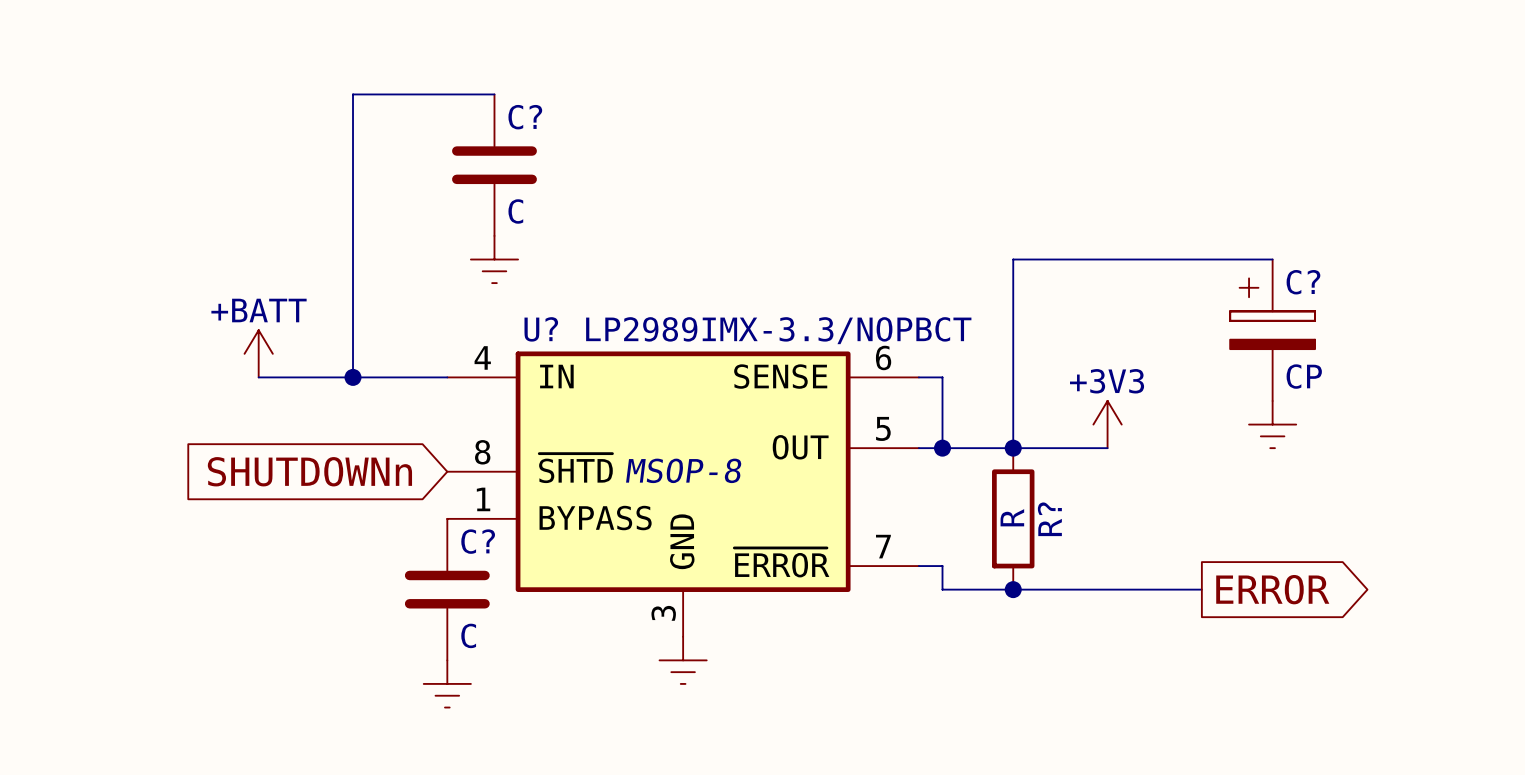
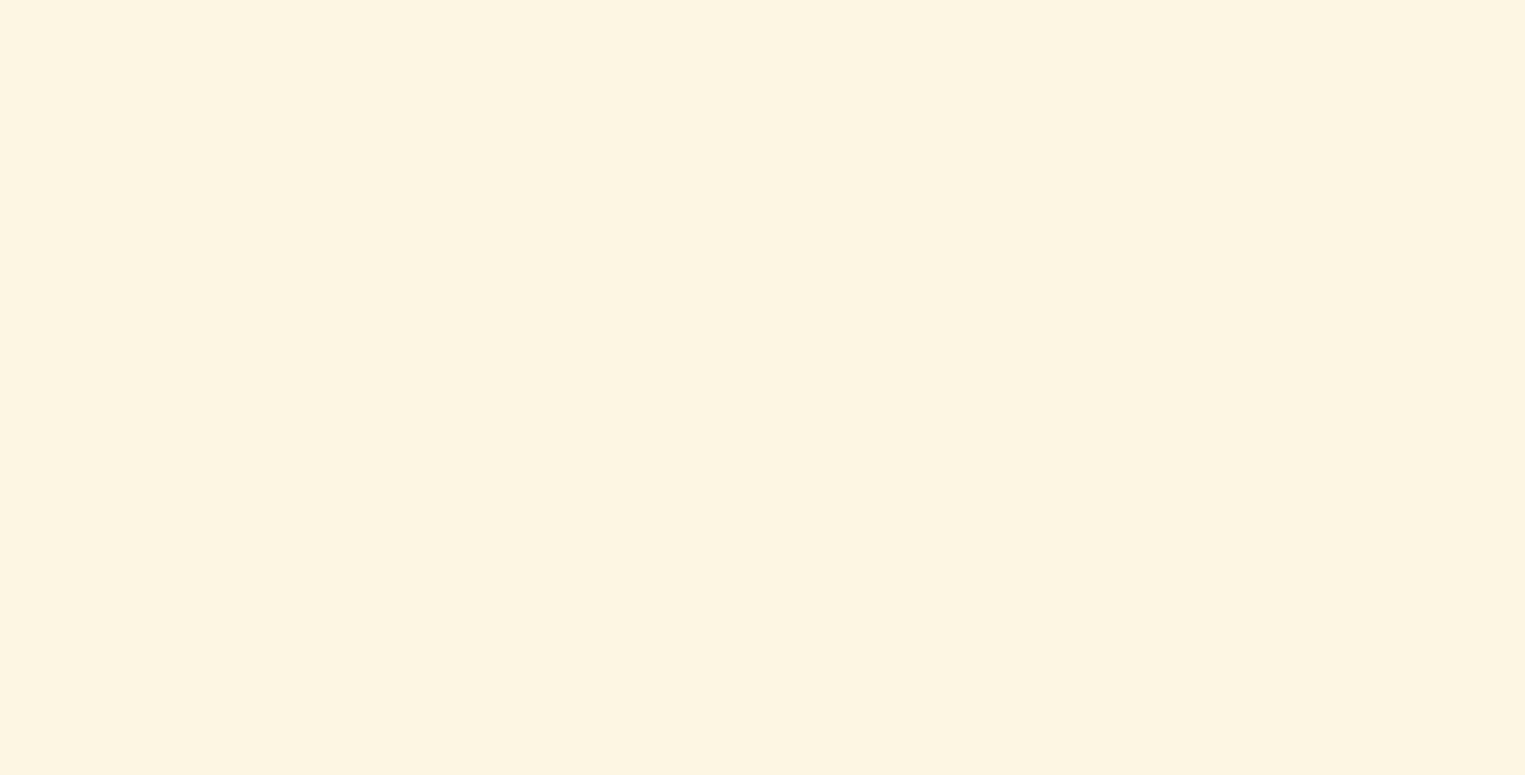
wire: (494, 94) (353, 94) (353, 377) -> none
C?: C (494, 165) -> none
power symbol: (494, 259) -> none
wire: (1272, 259) (1013, 259) (1013, 448) -> none
C?: CP (1272, 330) -> none
power symbol: +BATT (258, 353) -> none
wire: (258, 377) (447, 377) -> none
junction: (353, 377) -> none
wire: (918, 377) (942, 377) (942, 448) -> none
power symbol: +3V3 (1107, 424) -> none
power symbol: (1272, 424) -> none
wire: (918, 448) (1107, 448) -> none
junction: (942, 448) -> none
junction: (1013, 448) -> none
global label: SHUTDOWNn (309, 471) -> none
U?: LP2989IMX-3.3/NOPBCT (683, 494) -> none
R?: R (1013, 518) -> none
wire: (918, 566) (942, 566) (942, 589) (1201, 589) -> none
C?: C (447, 589) -> none
junction: (1013, 589) -> none
global label: ERROR (1272, 589) -> none
power symbol: (683, 660) -> none
power symbol: (447, 683) -> none

